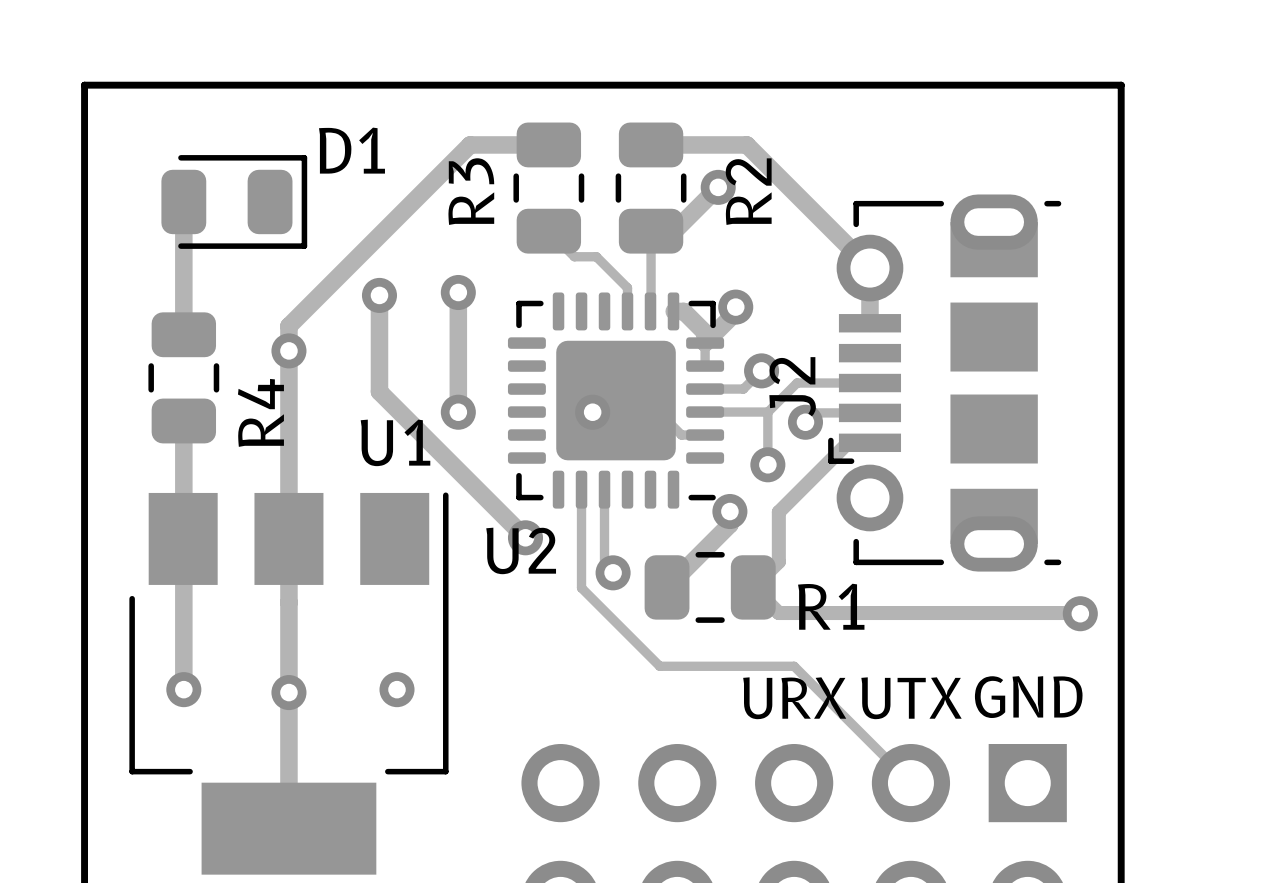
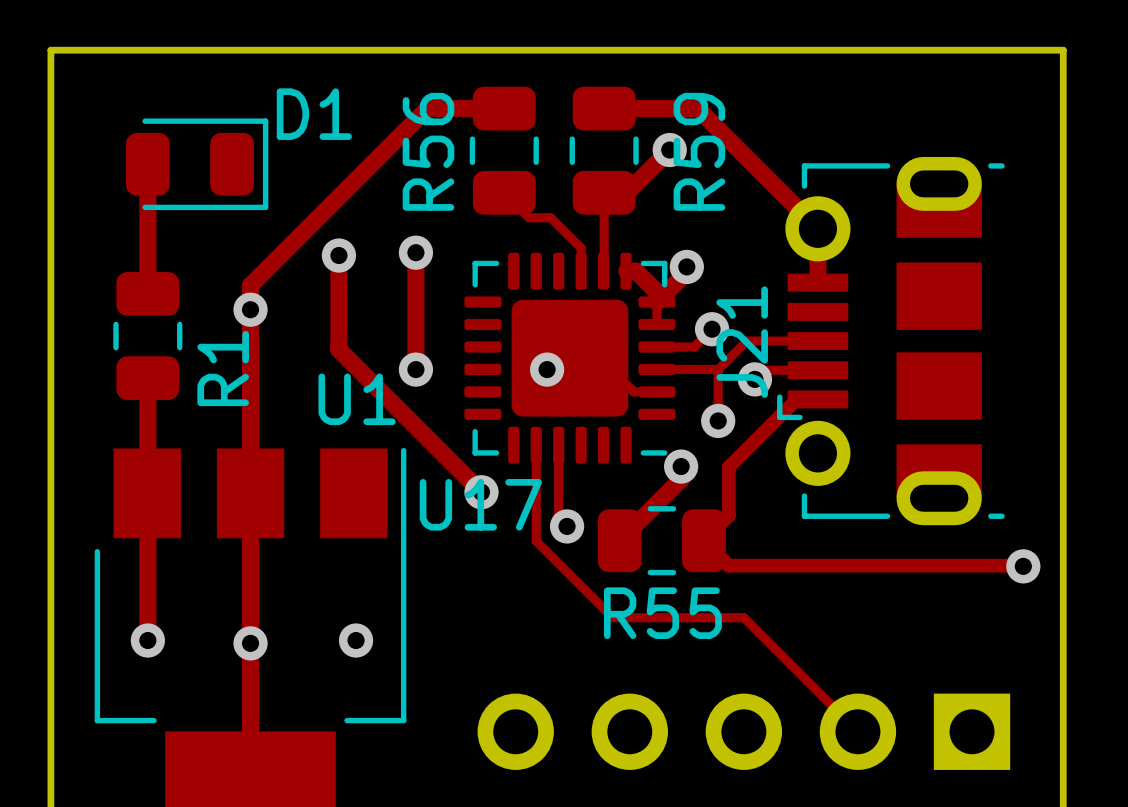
R3 name: R3 (471, 191) -> R56 (428, 151)
R2 name: R2 (748, 191) -> R59 (699, 151)
J2 name: J2 (792, 386) -> J21 (742, 342)
R4 name: R4 (260, 412) -> R1 (223, 368)
U2 name: U2 (521, 550) -> U17 (480, 504)
R1 name: R1 (831, 606) -> R55 (662, 613)
text: GND (1028, 697) -> none
text: URX (794, 698) -> none
text: UTX (911, 698) -> none

